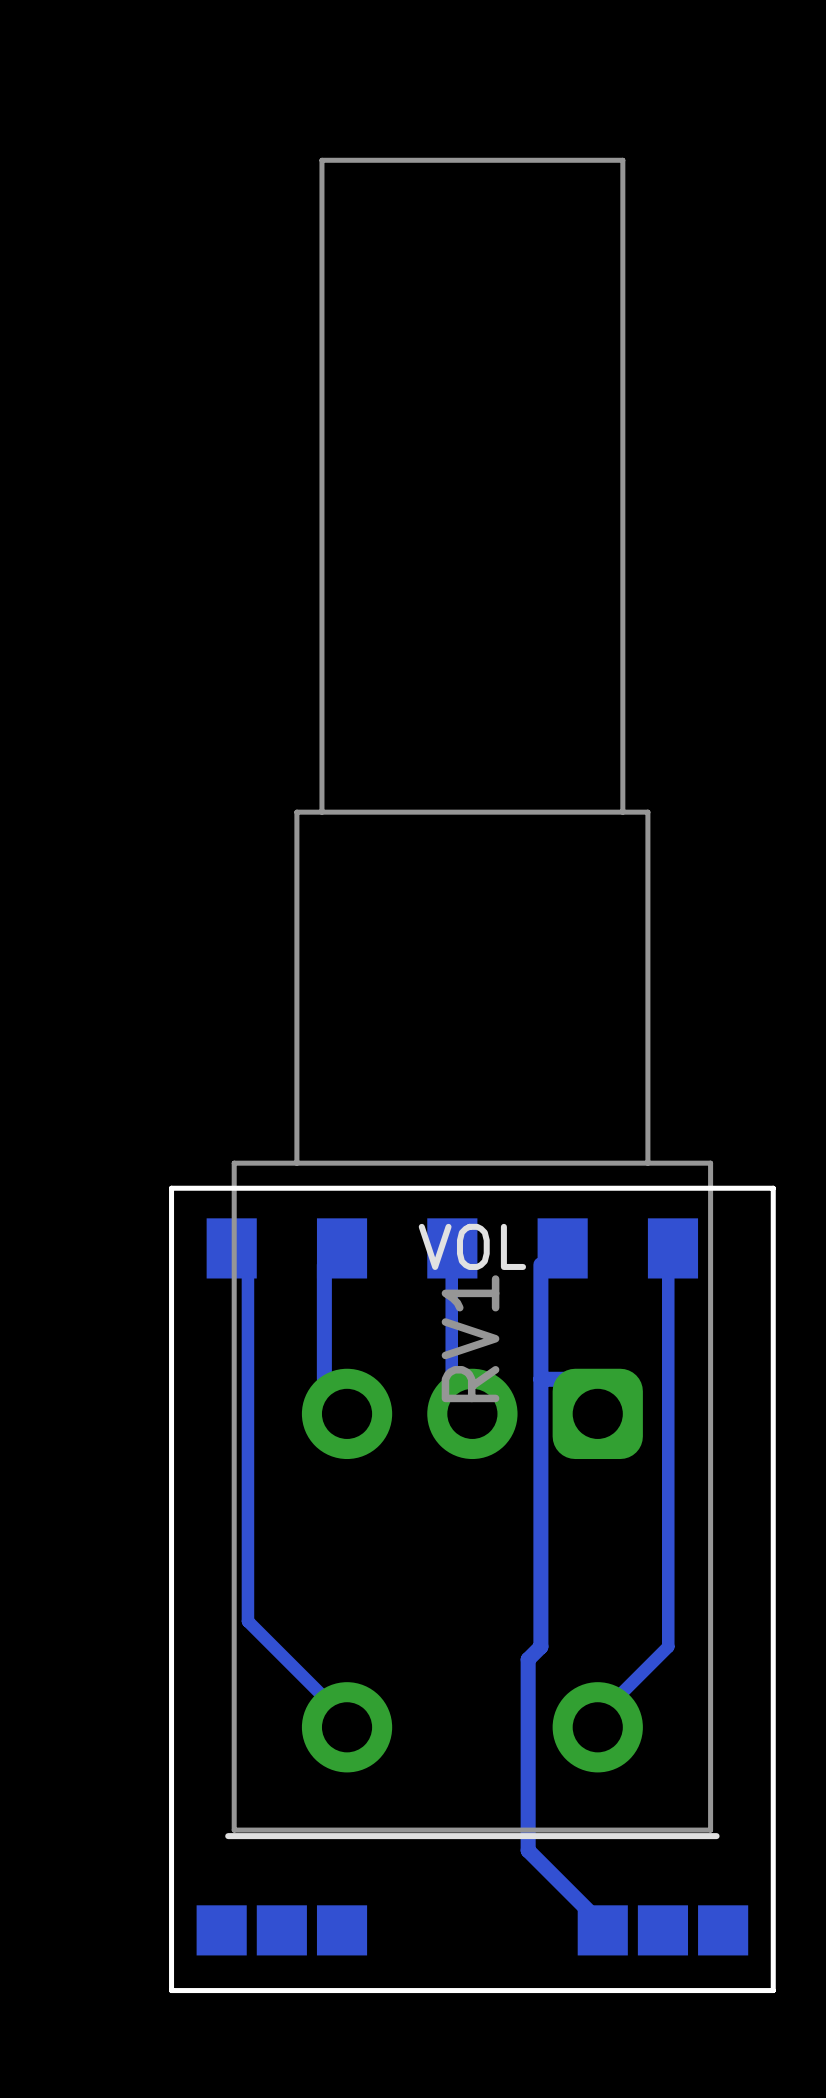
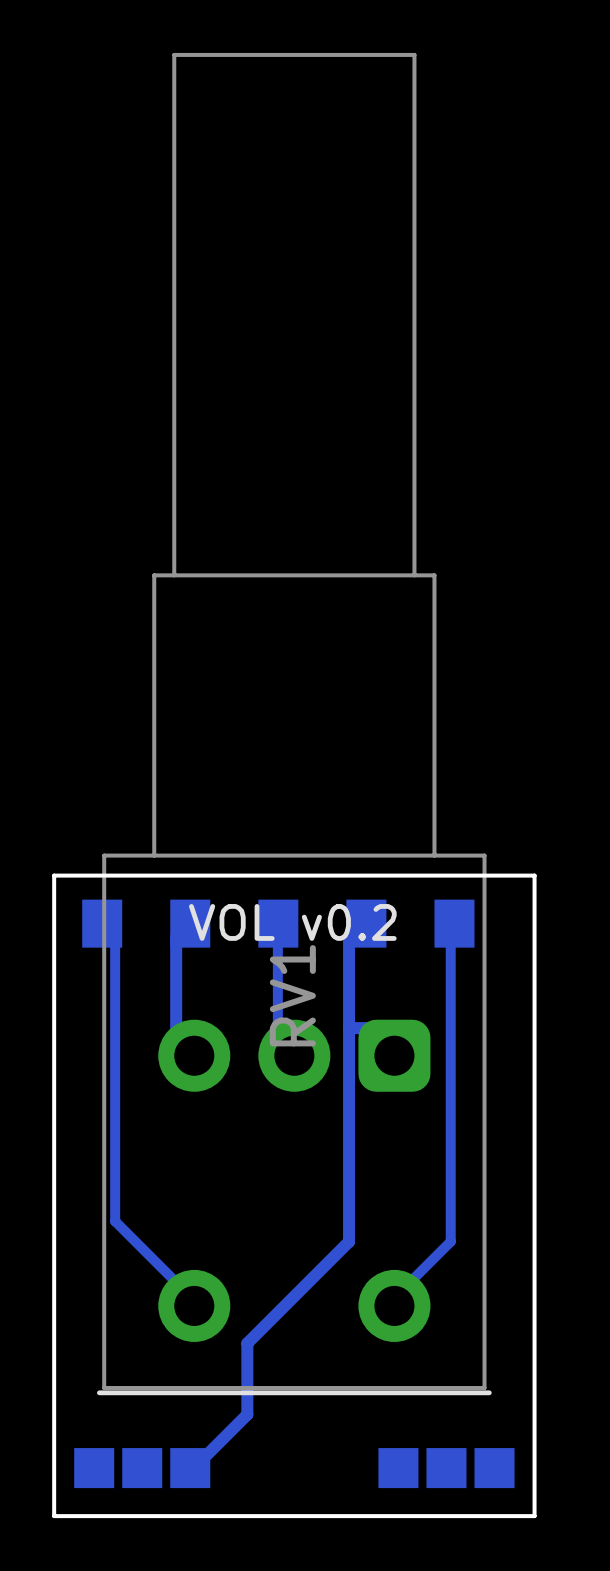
text: VOL (472, 1246) -> VOL v0.2 (292, 922)
bottom track: (528, 1659) (528, 1850) (591, 1914) -> (338, 1251) (247, 1343) (247, 1414) (206, 1455)

